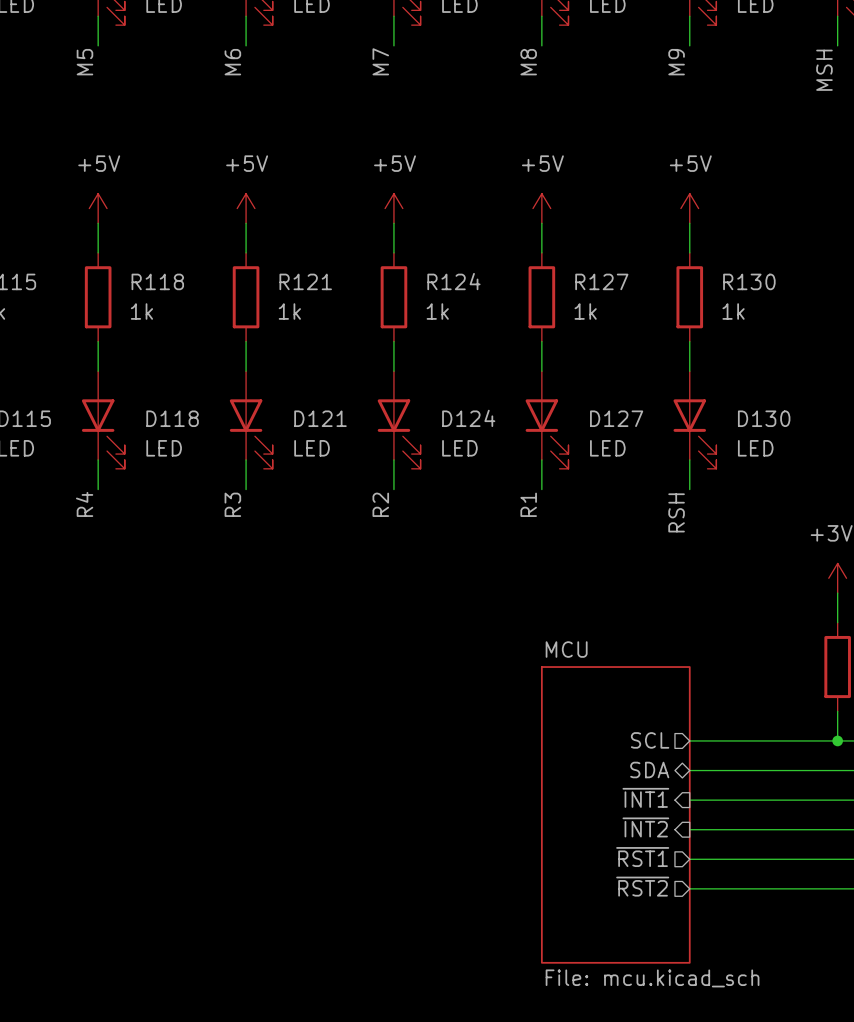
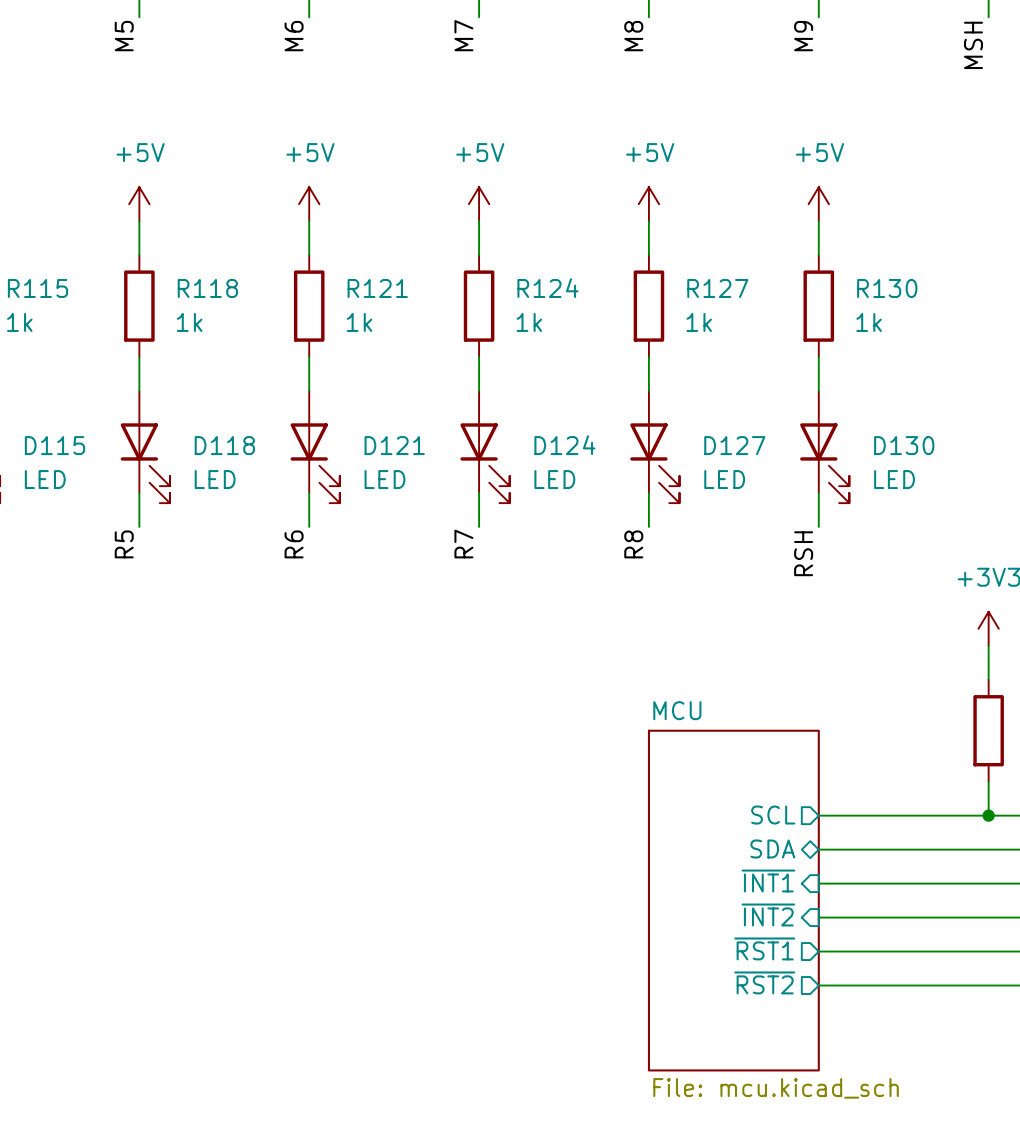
label: R4 (84, 504) -> R5 (124, 544)
label: R3 (232, 504) -> R6 (294, 544)
label: R2 (380, 504) -> R7 (463, 544)
label: R1 (528, 504) -> R8 (633, 544)

